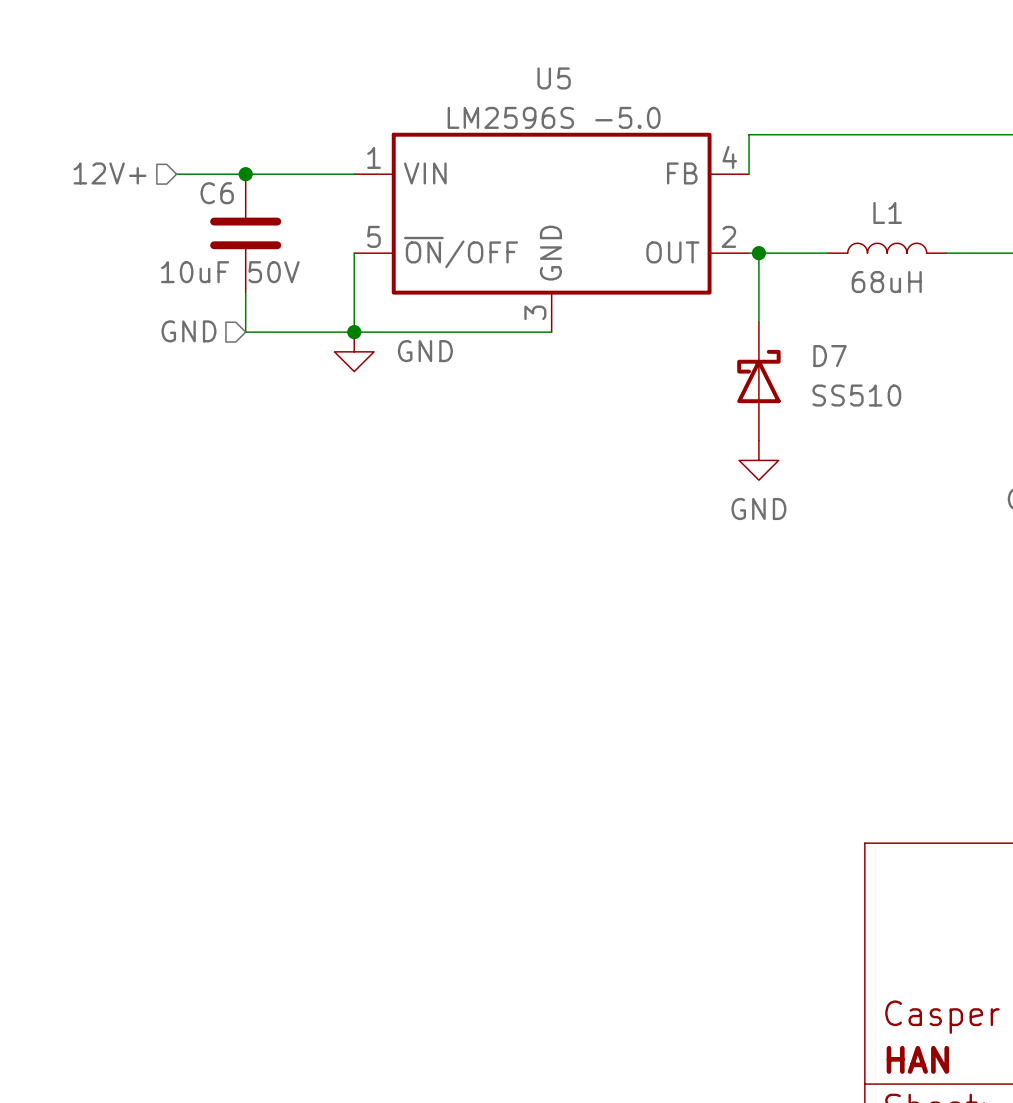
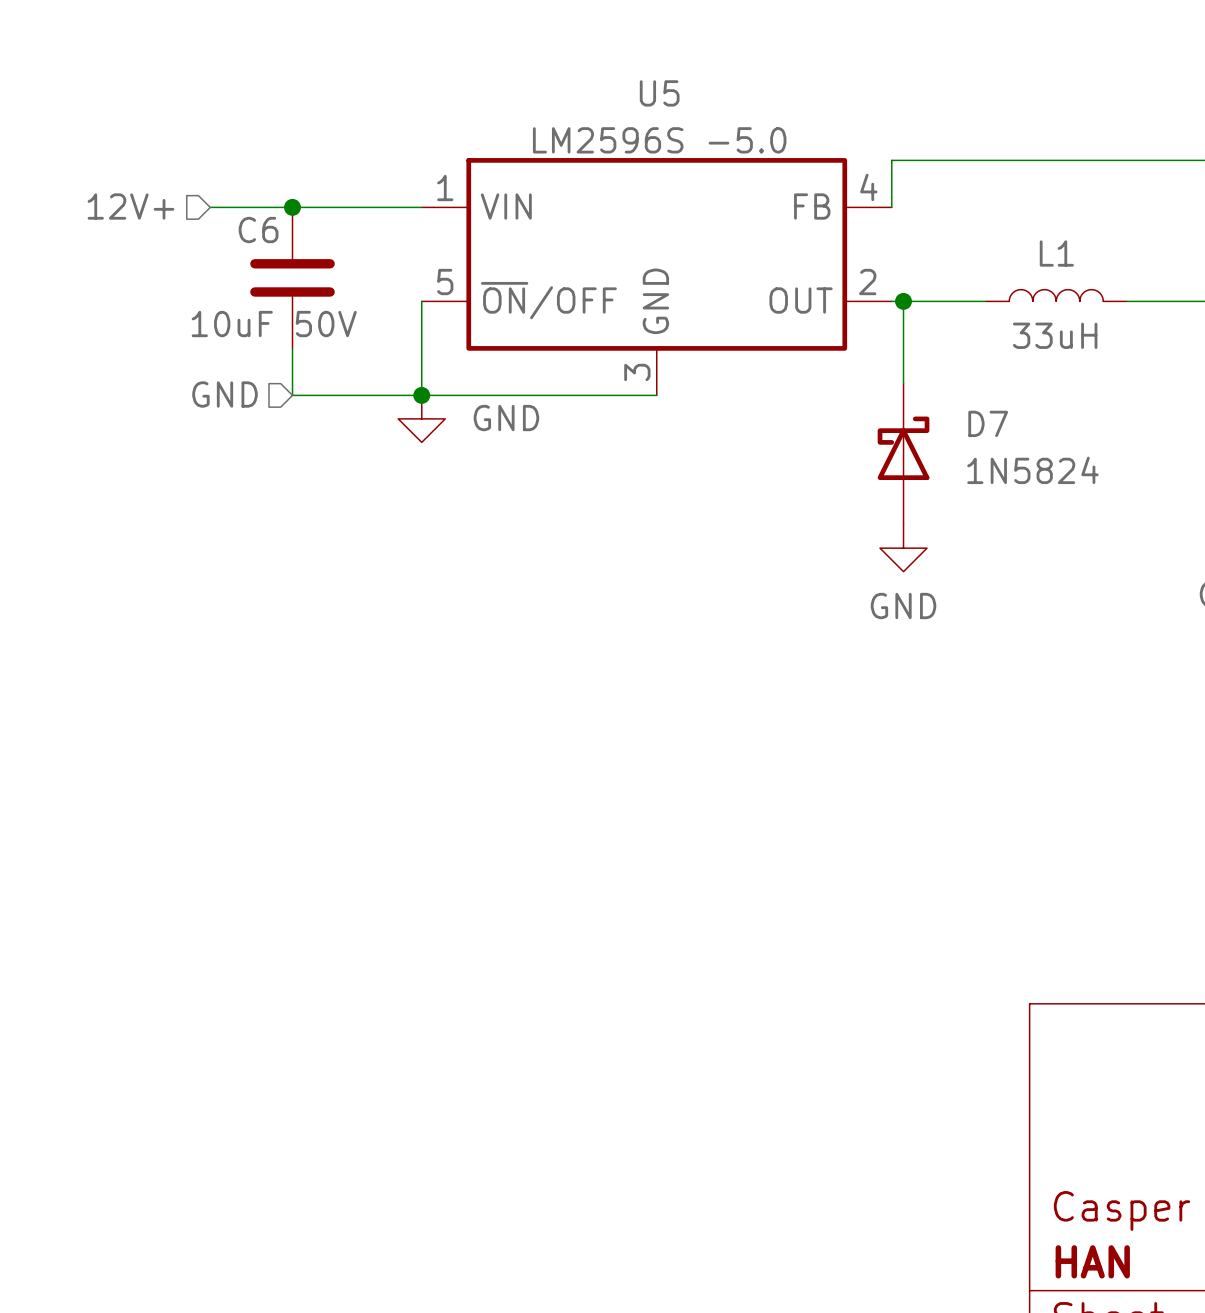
L1 value: 68uH (886, 282) -> 33uH (1055, 335)
D7 value: SS510 (856, 395) -> 1N5824 (1032, 470)

